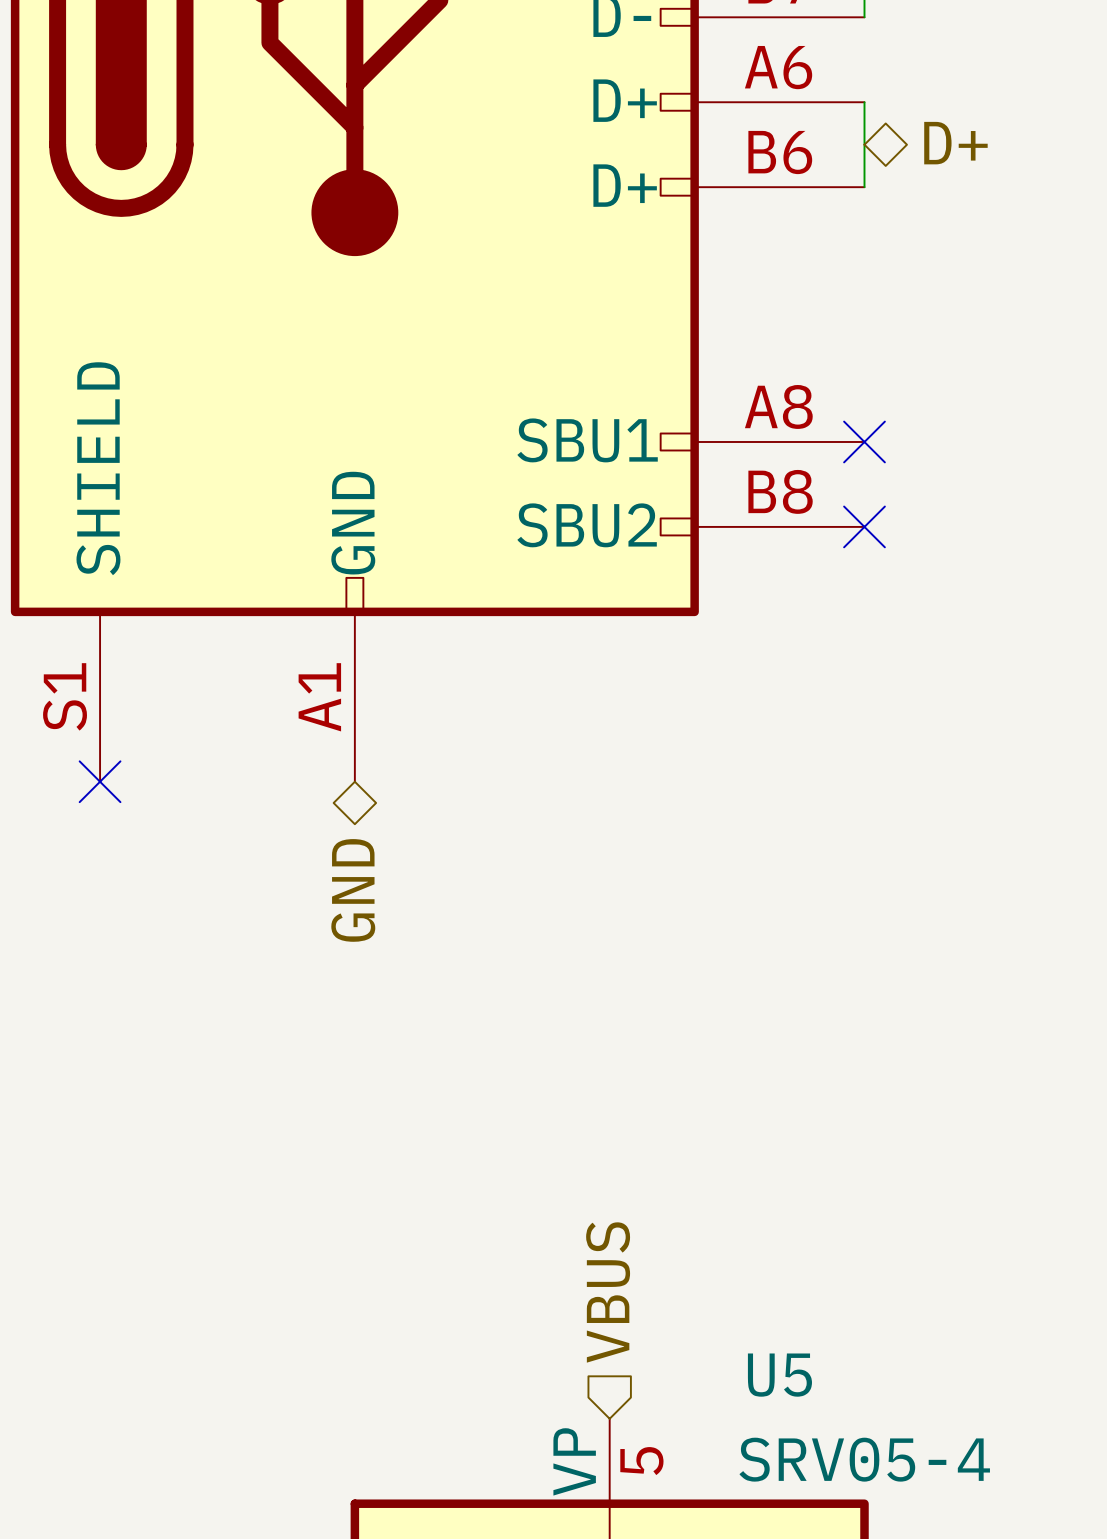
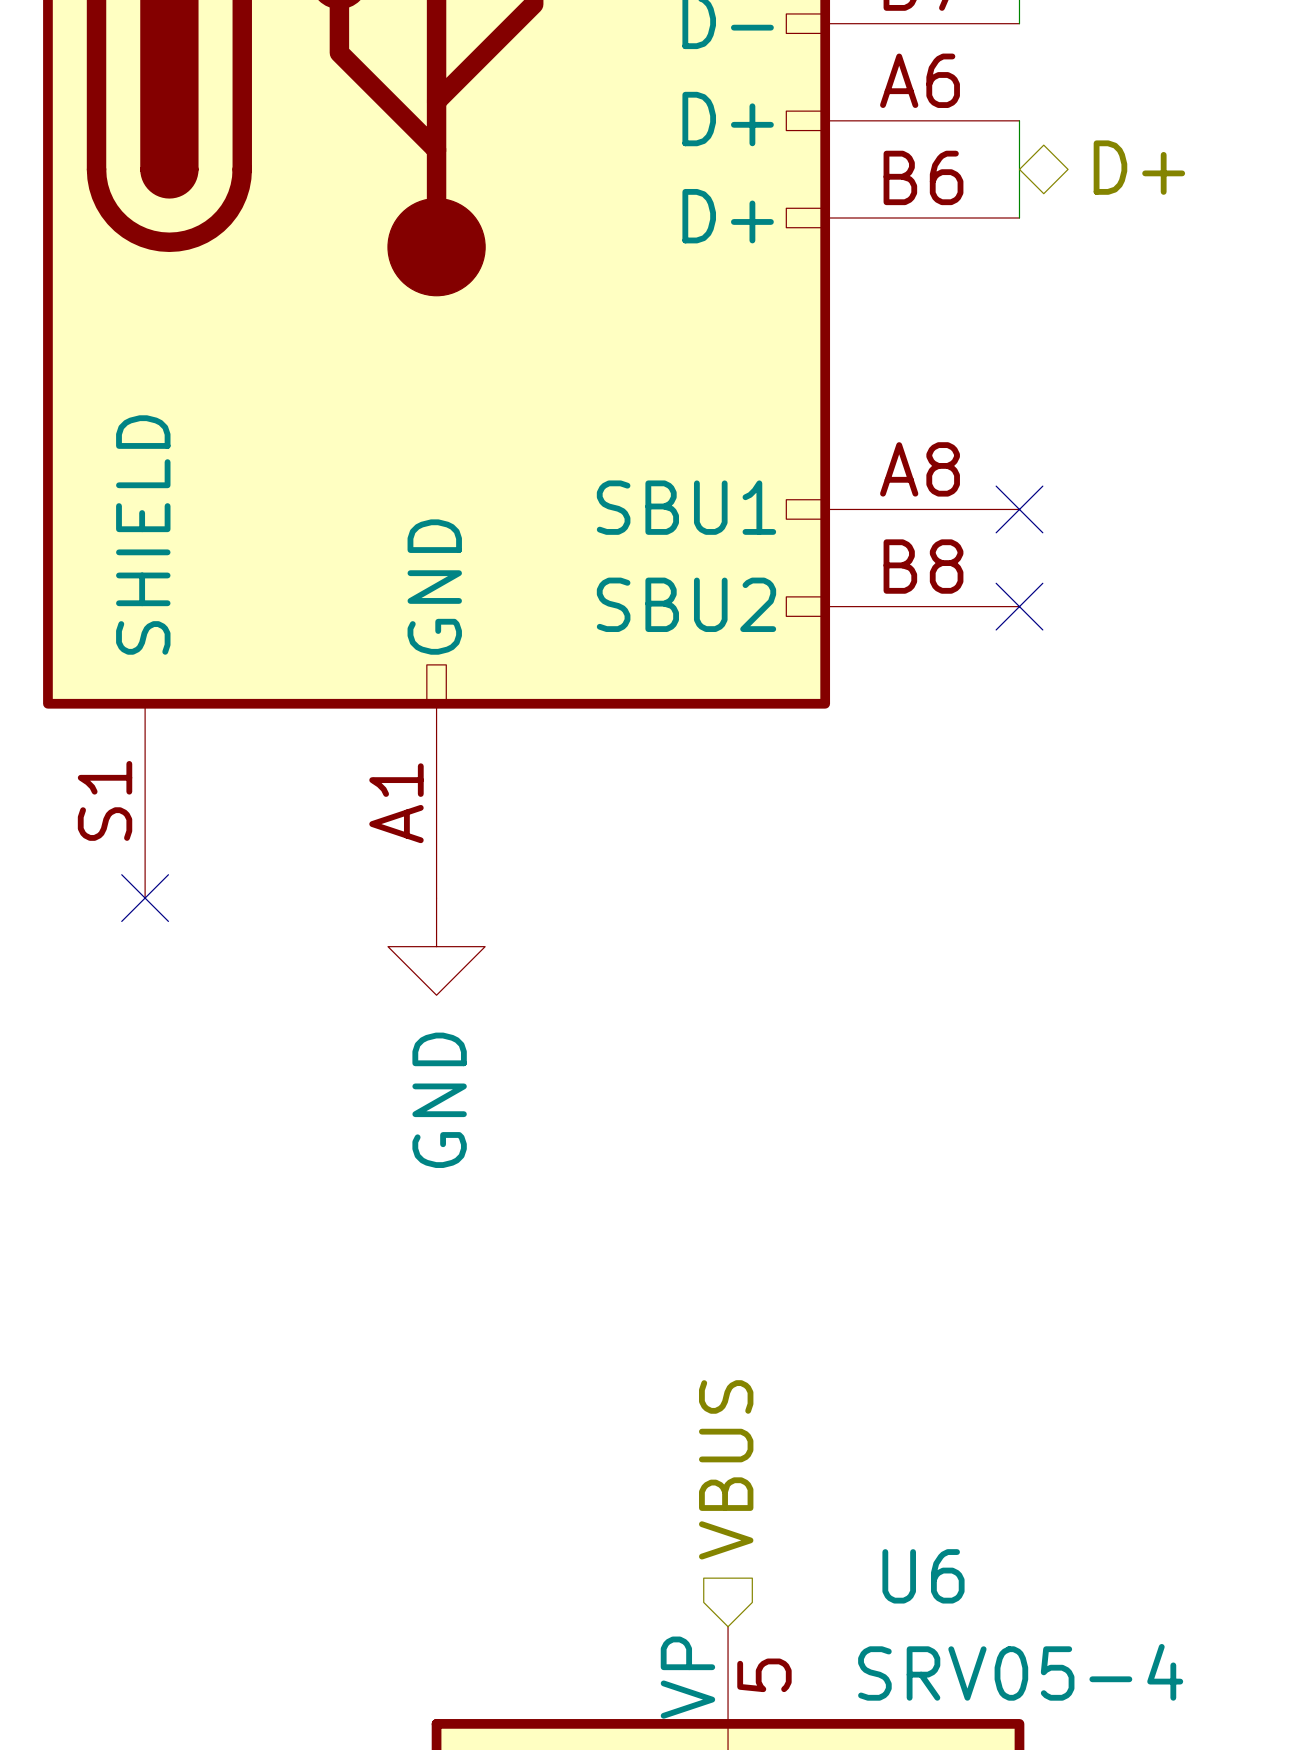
power symbol: none -> GND (436, 946)
hierarchical label: GND (353, 890) -> none
U5 name: U5 (779, 1375) -> U6 (923, 1576)

